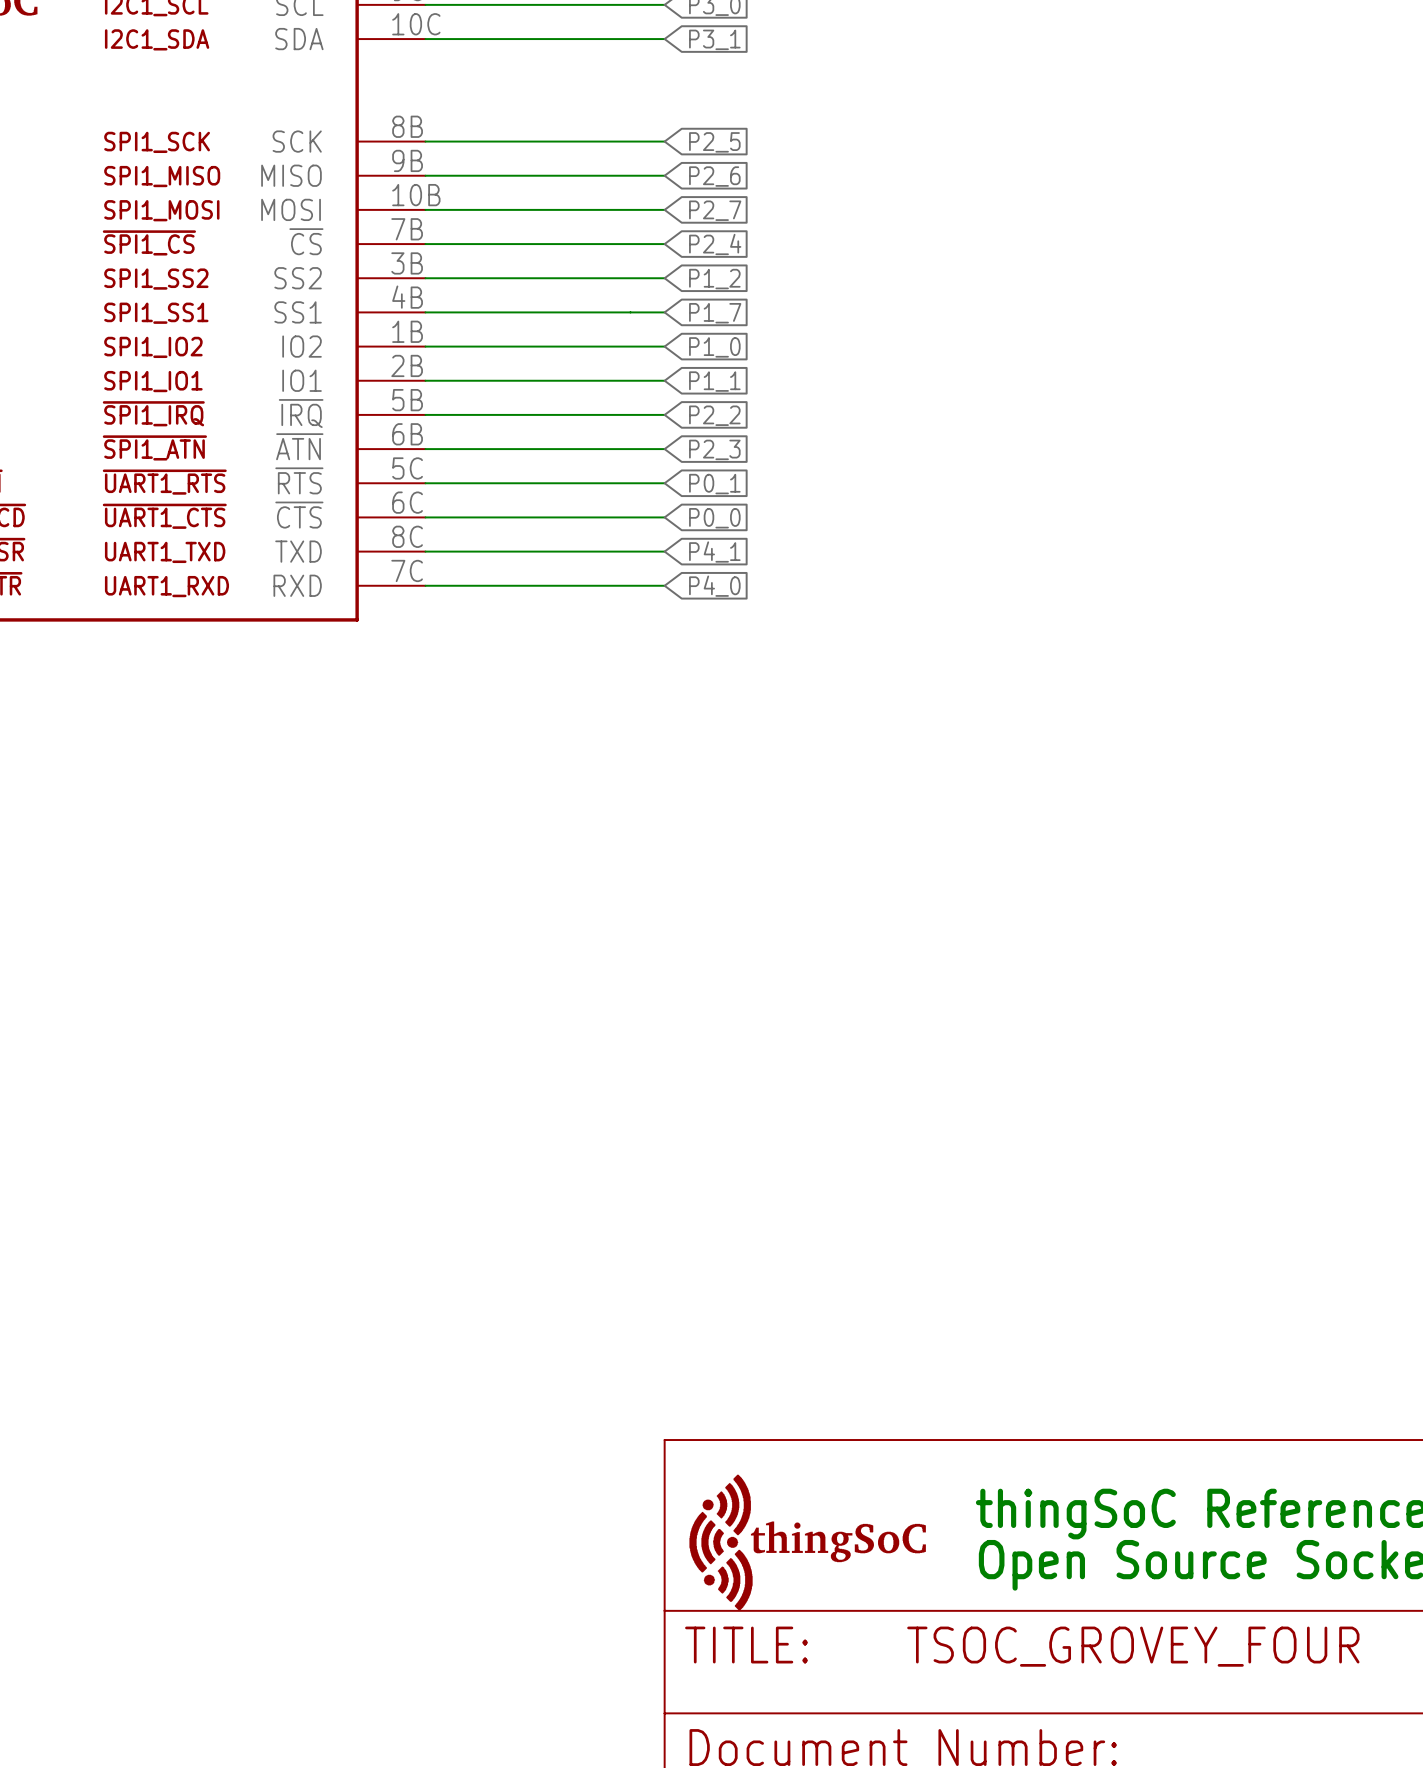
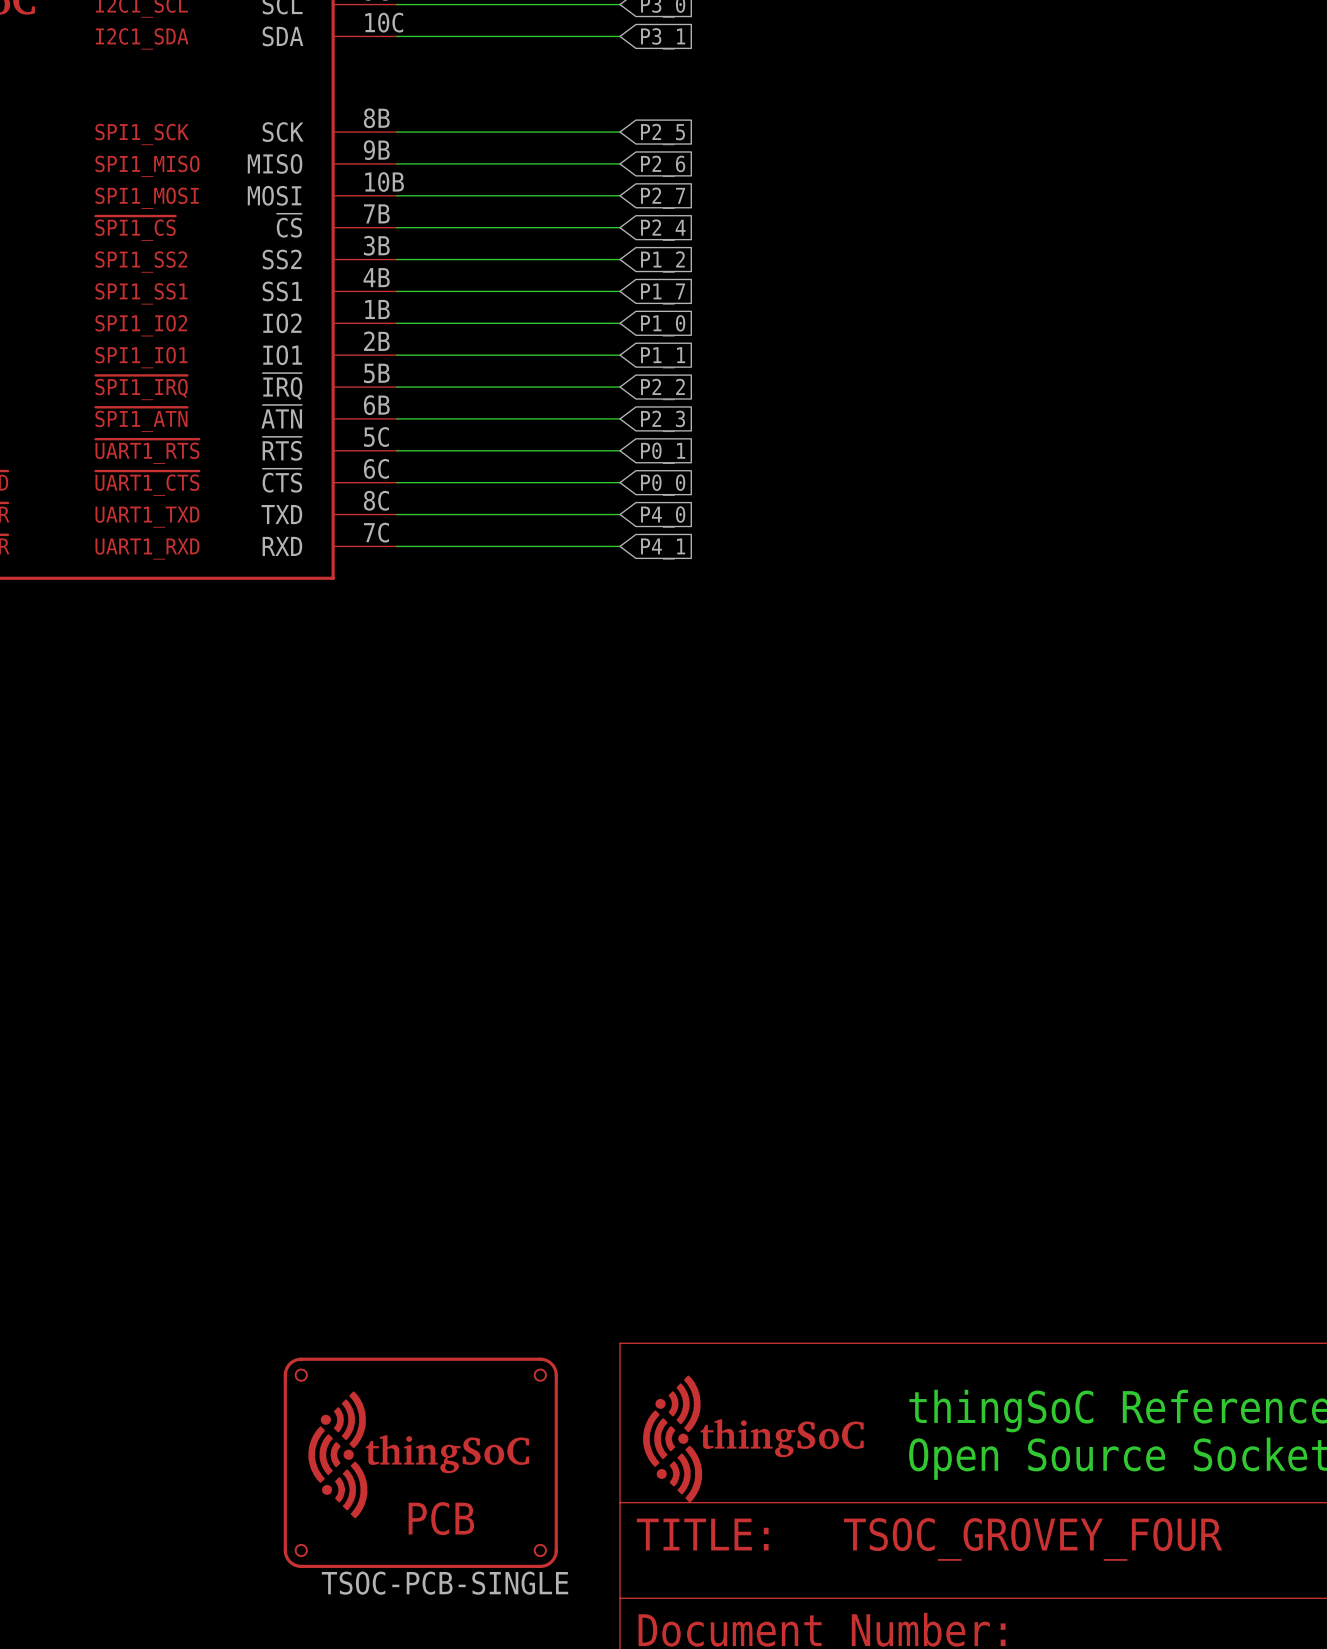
global label: P4_1 (714, 552) -> P4_0 (663, 516)
global label: P4_0 (714, 586) -> P4_1 (663, 549)
part: none -> TSOC-PCB-SINGLE (420, 1462)

